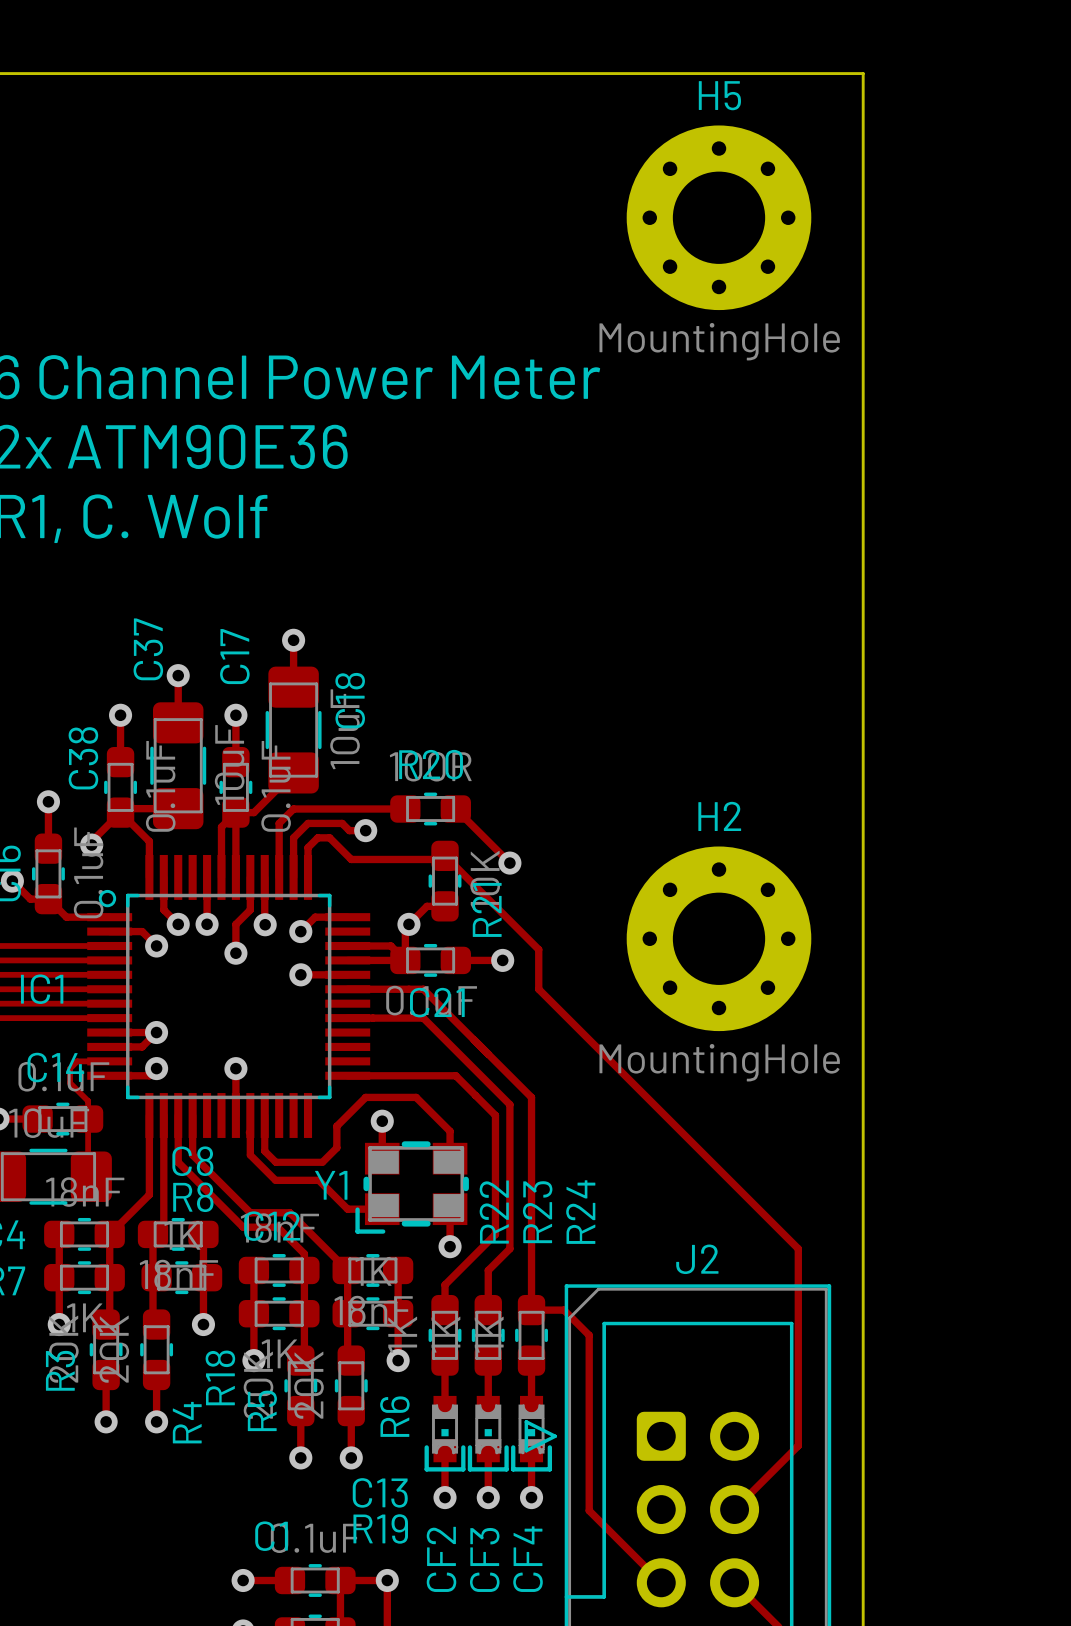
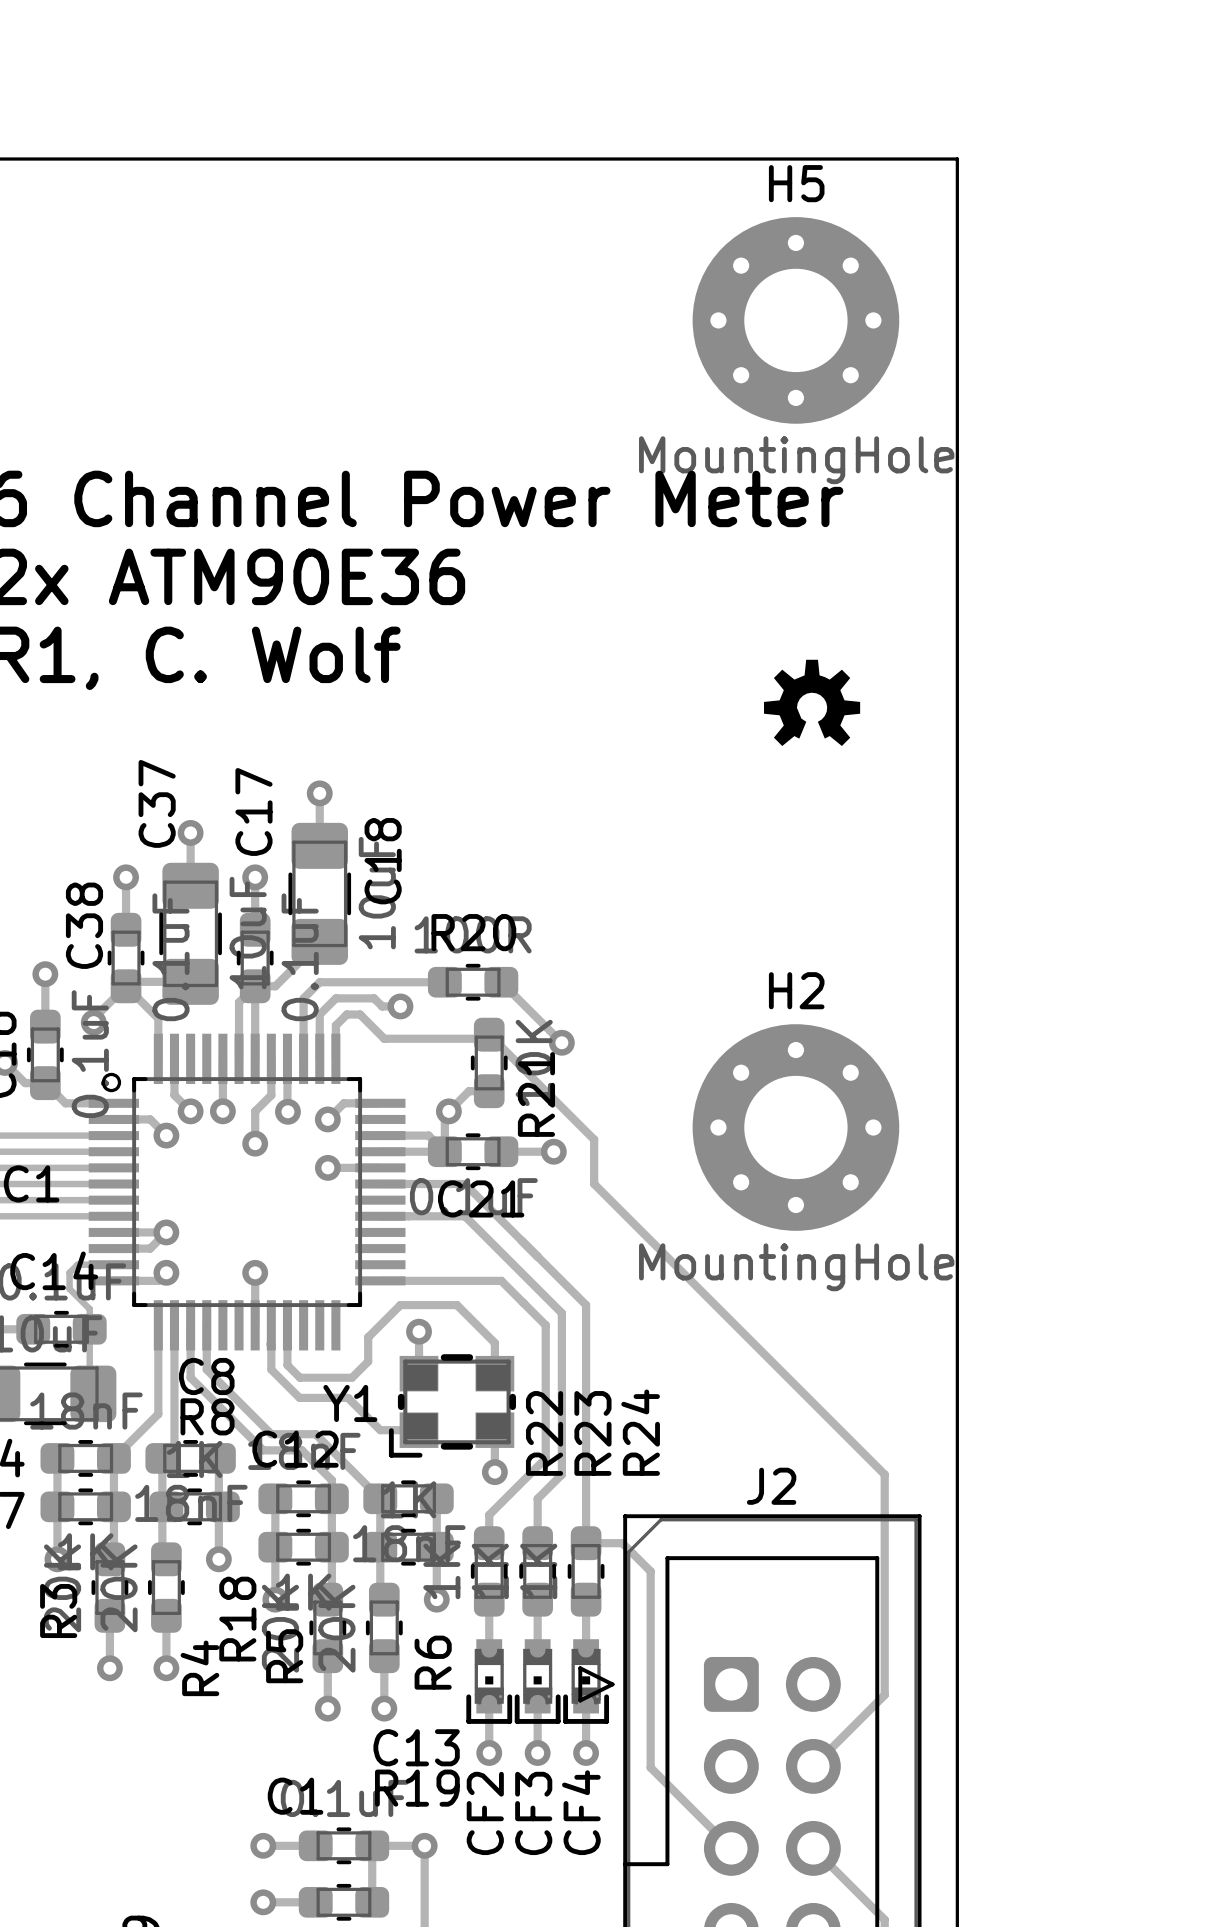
drawing: none -> [764, 659, 861, 746]

